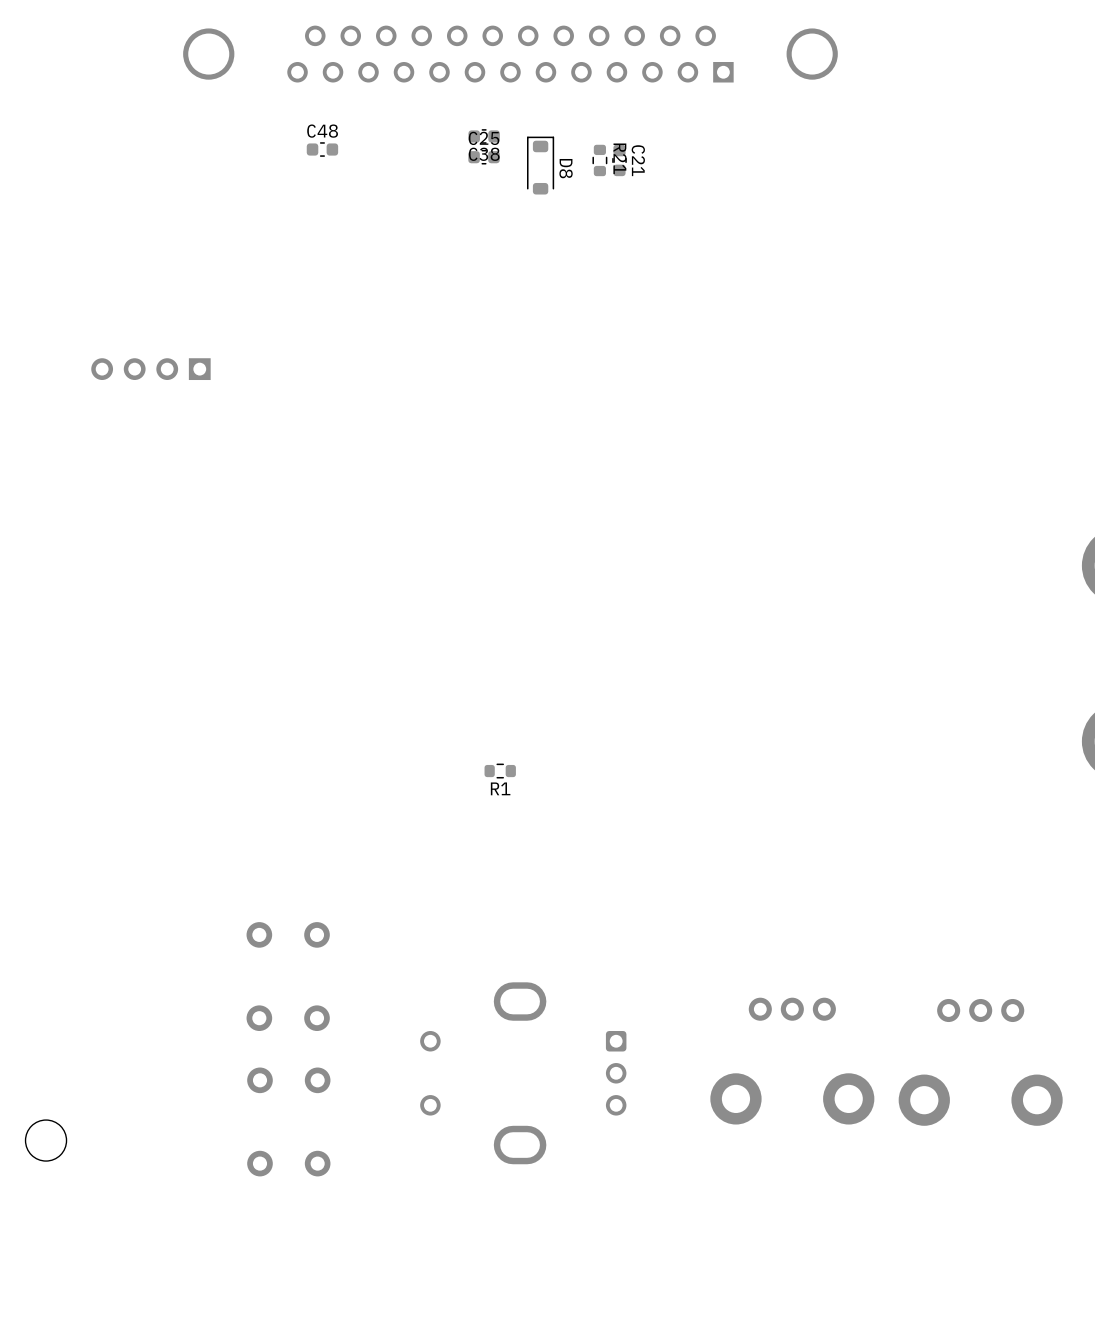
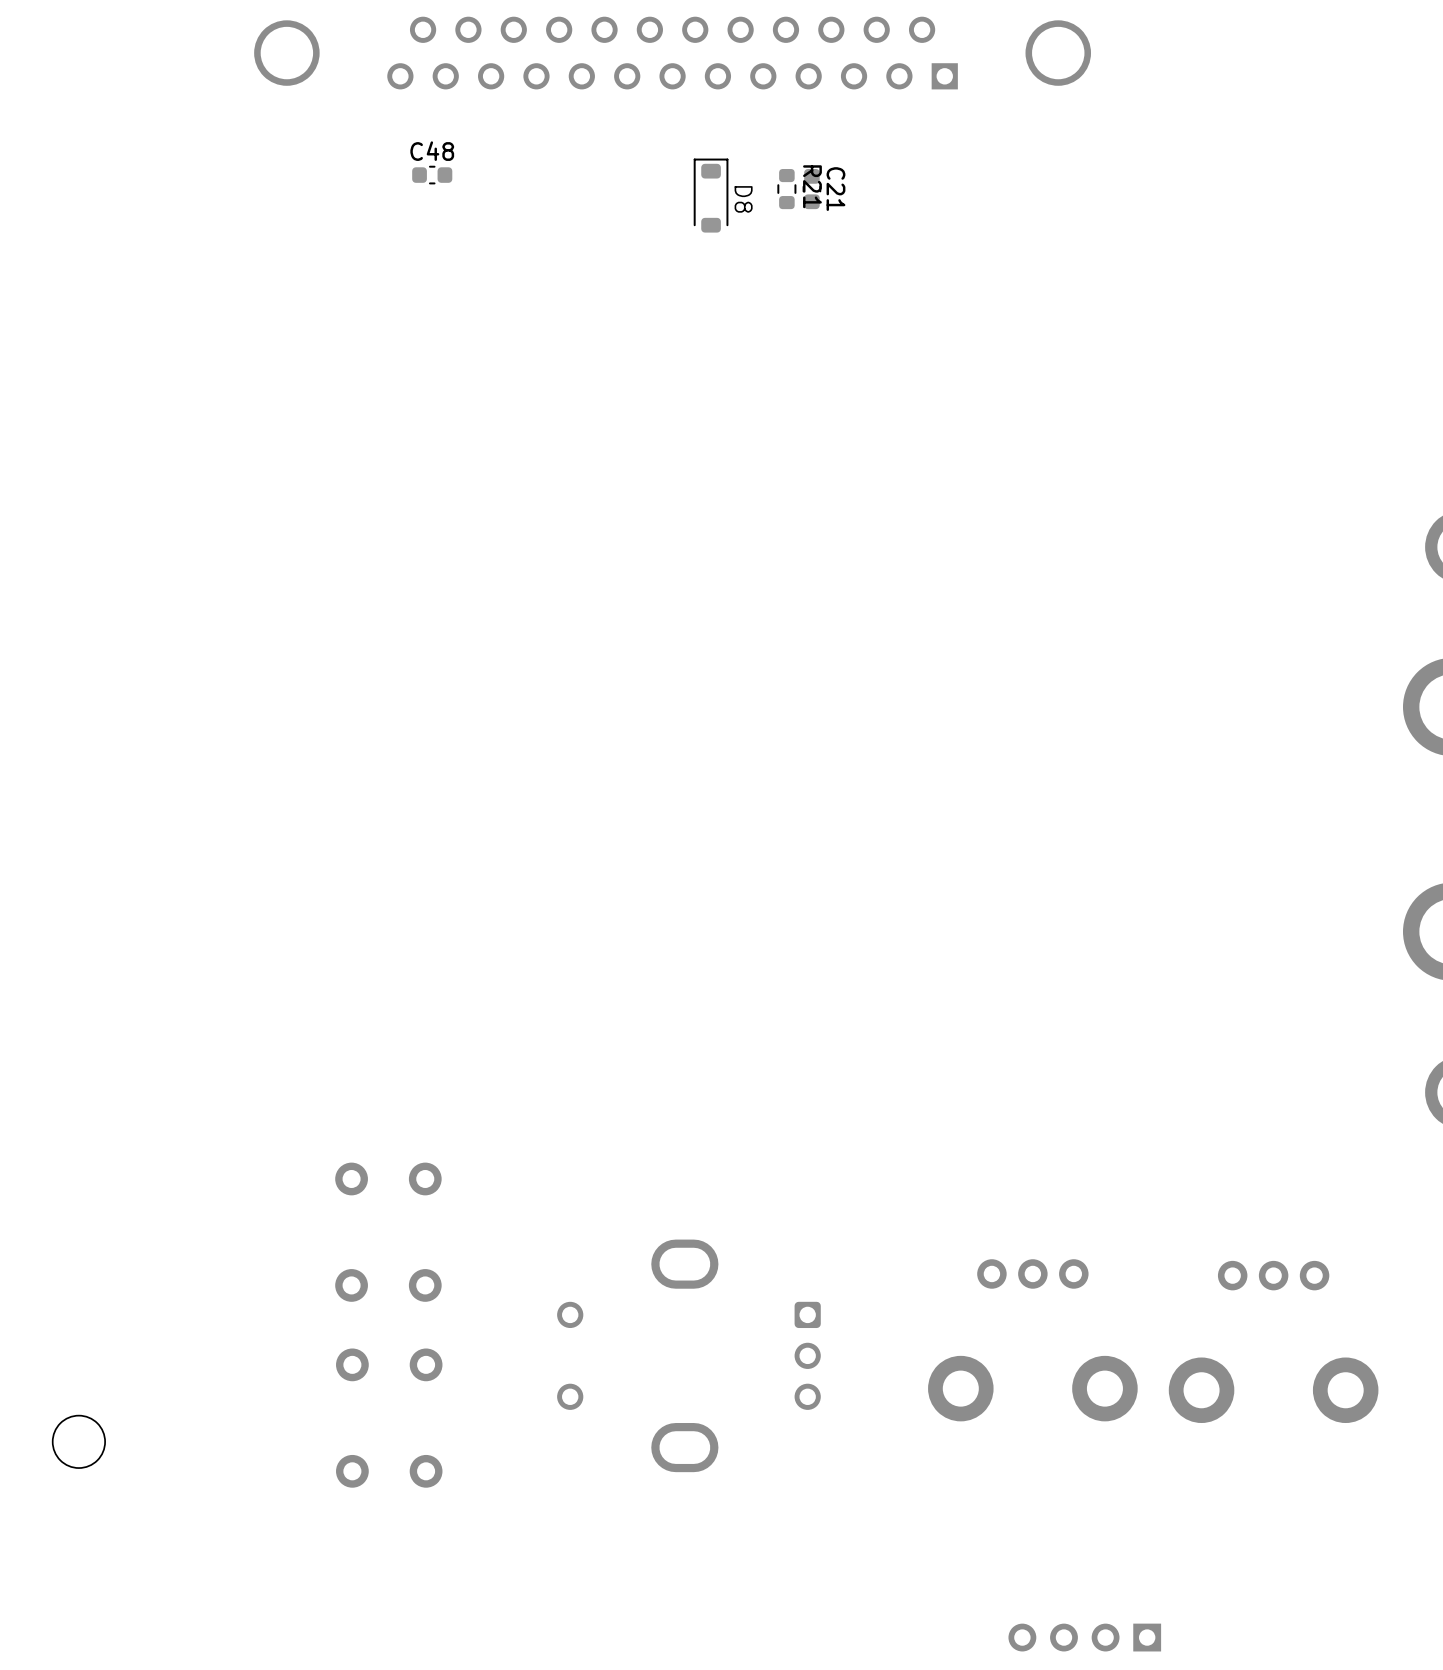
C38: (484, 136) -> none
C25: (484, 157) -> none
part: (150, 369) -> none
R1: (500, 771) -> none
part: none -> (1084, 1637)

